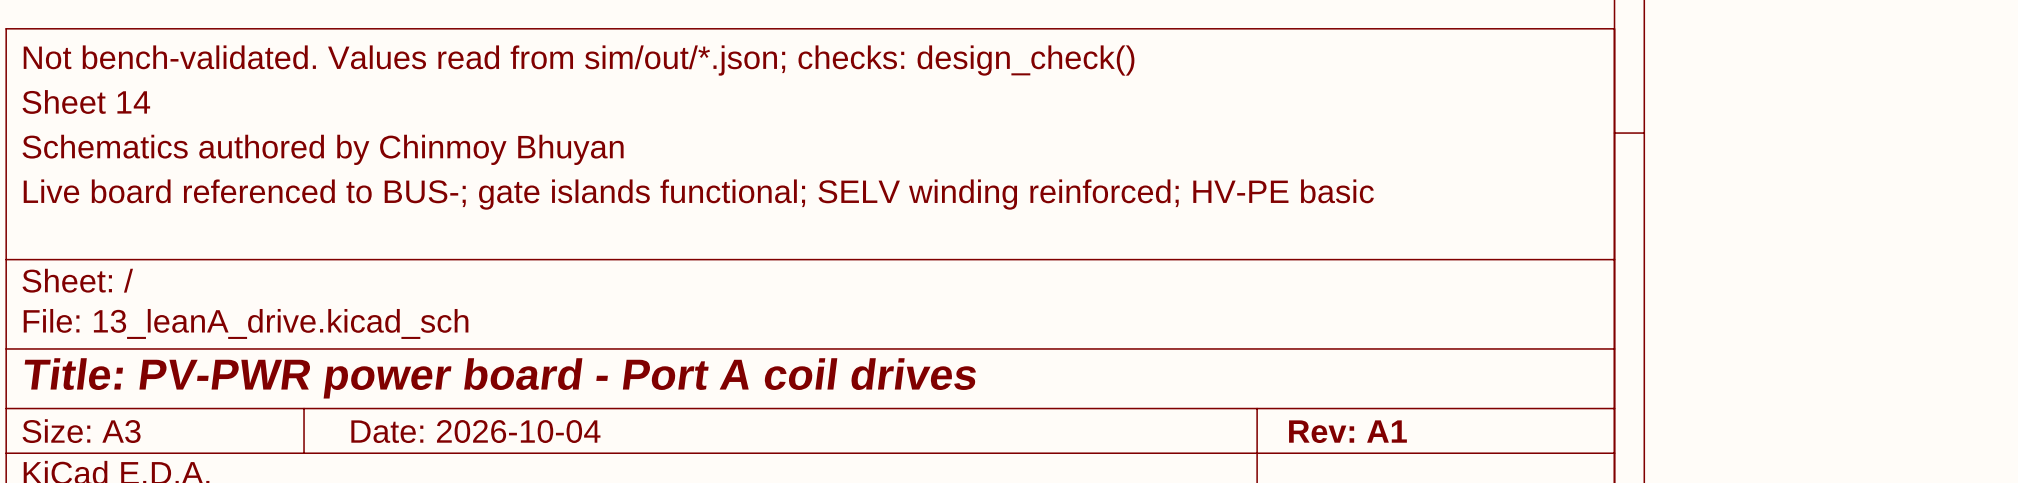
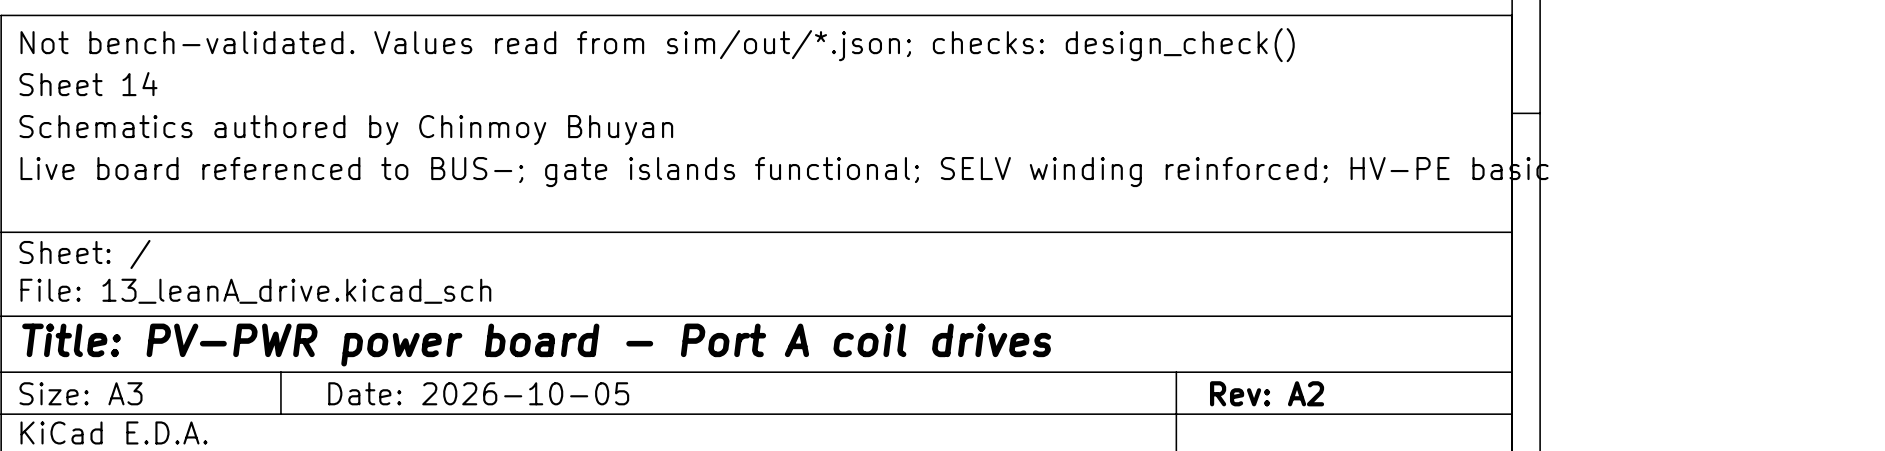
title block: Date: 2026-10-04 (475, 431) -> Date: 2026-10-05 (478, 393)
title block: Rev: A1 (1347, 431) -> Rev: A2 (1267, 393)

